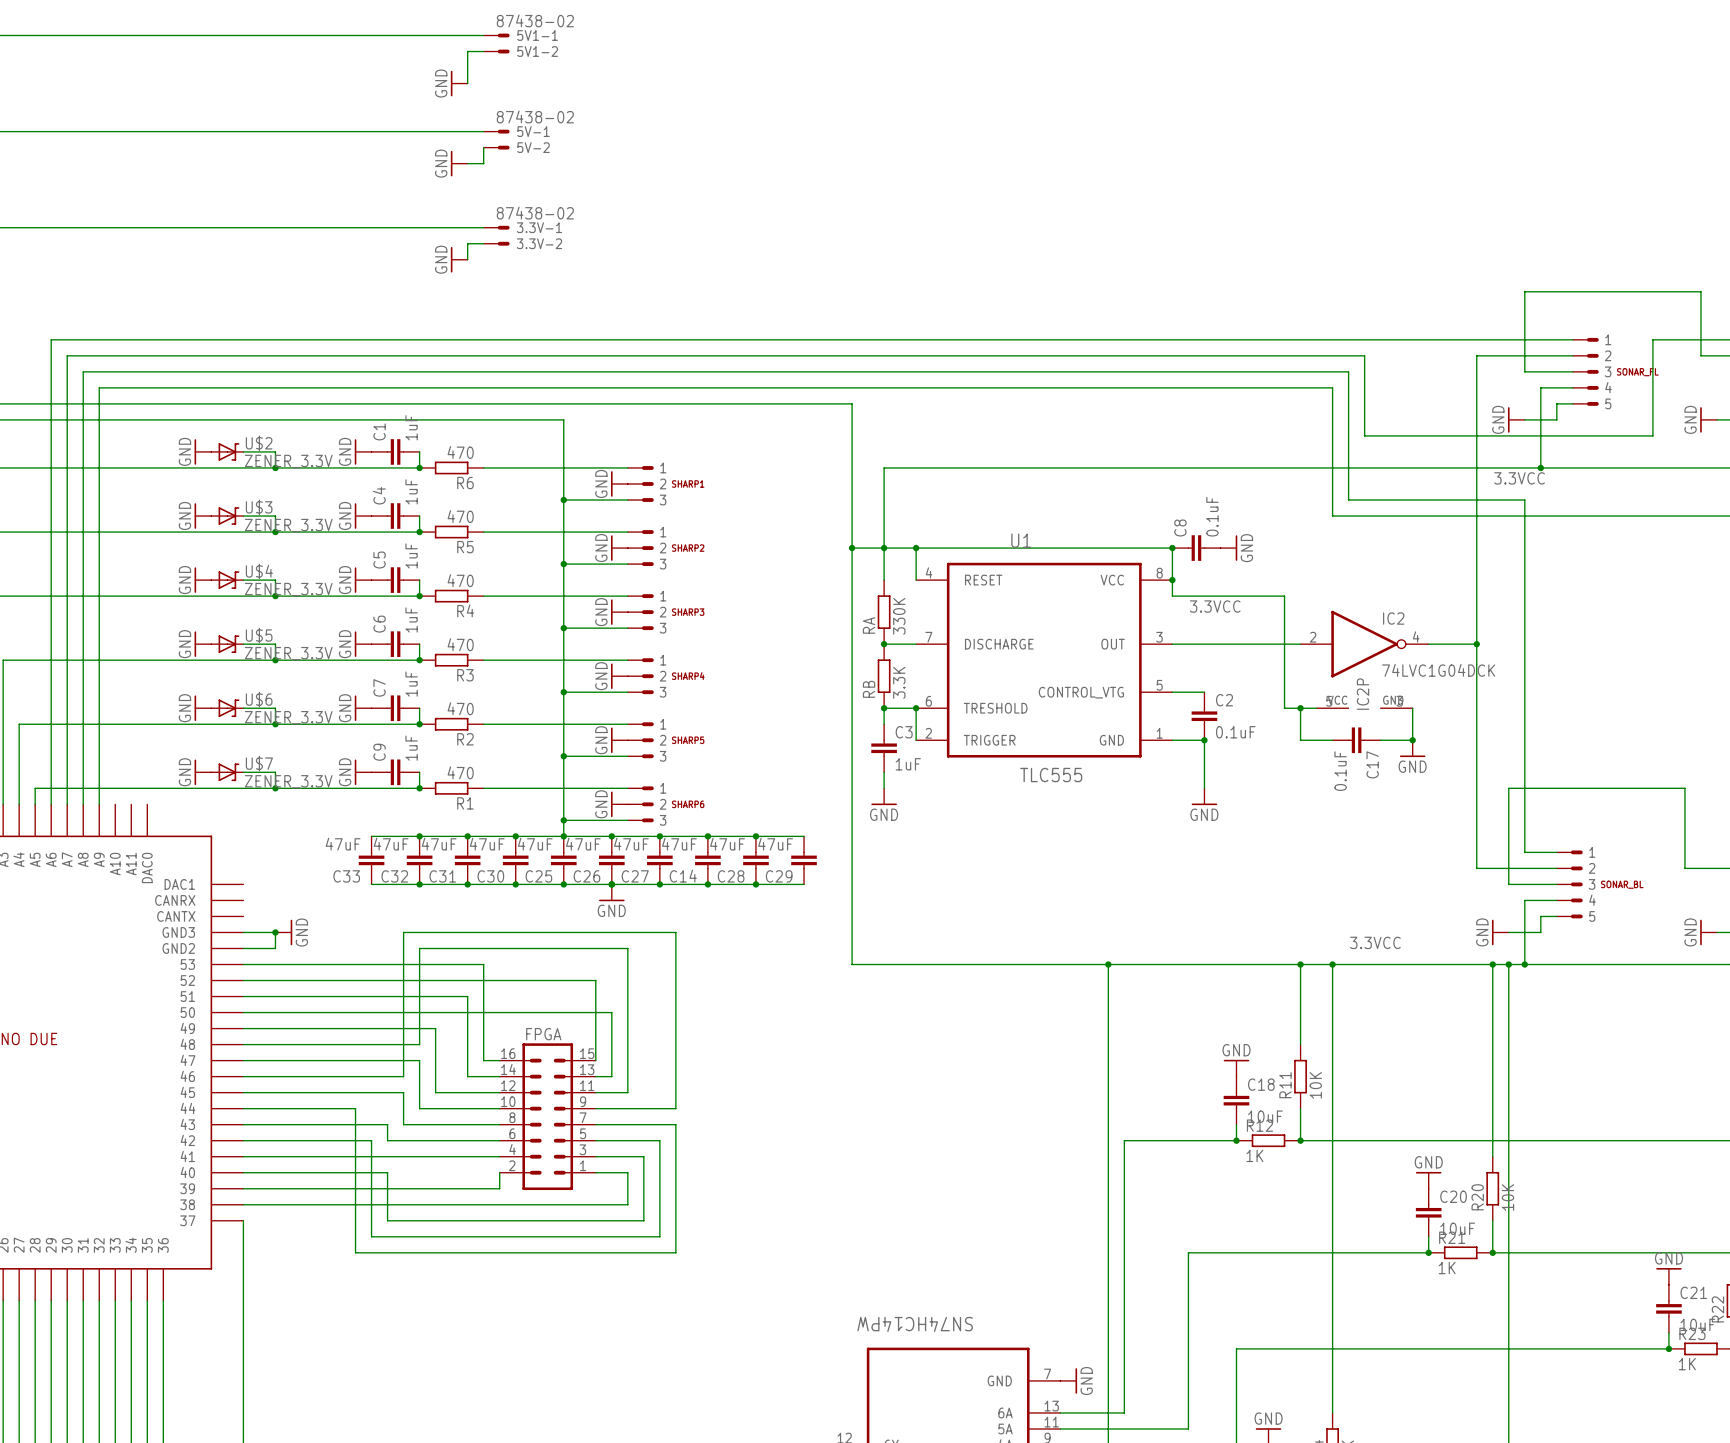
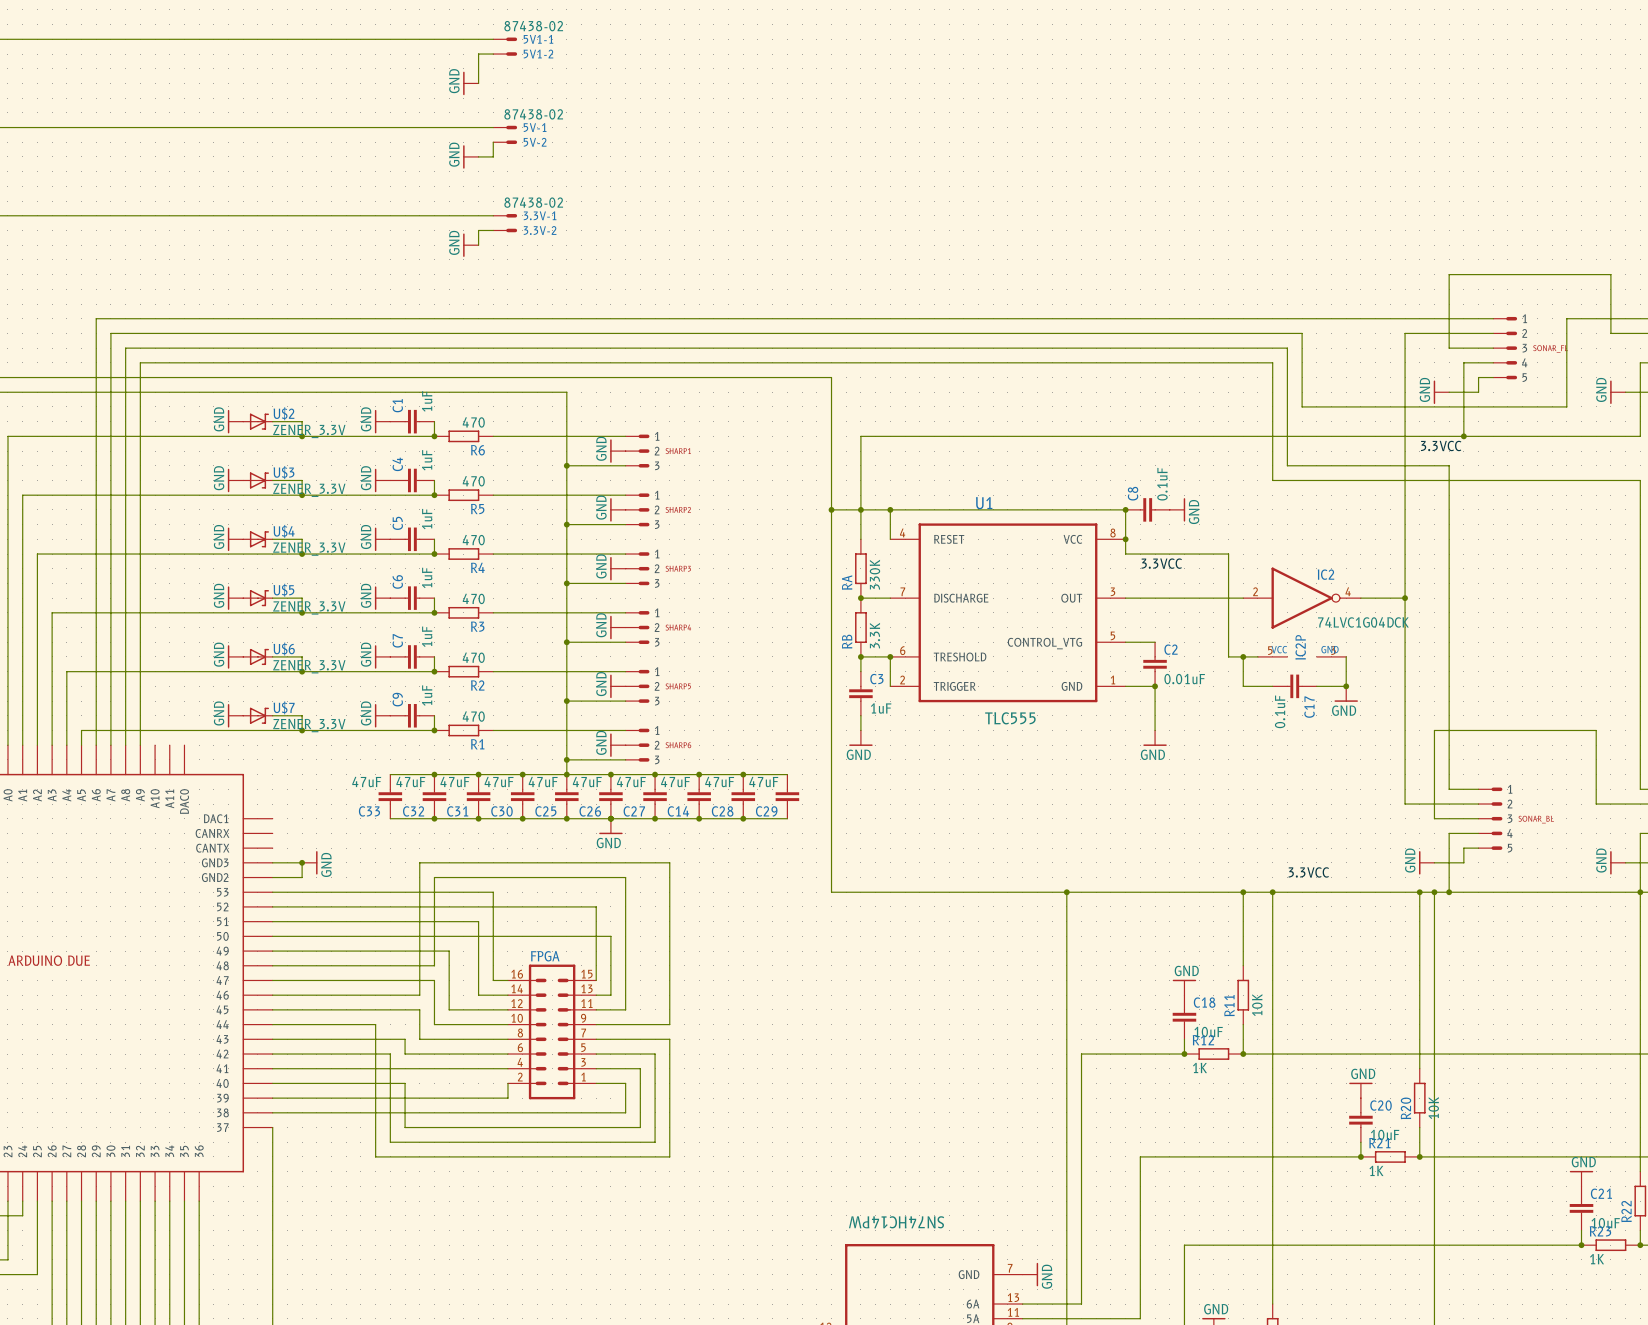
C2 value: 0.1uF (1235, 732) -> 0.01uF (1184, 679)

